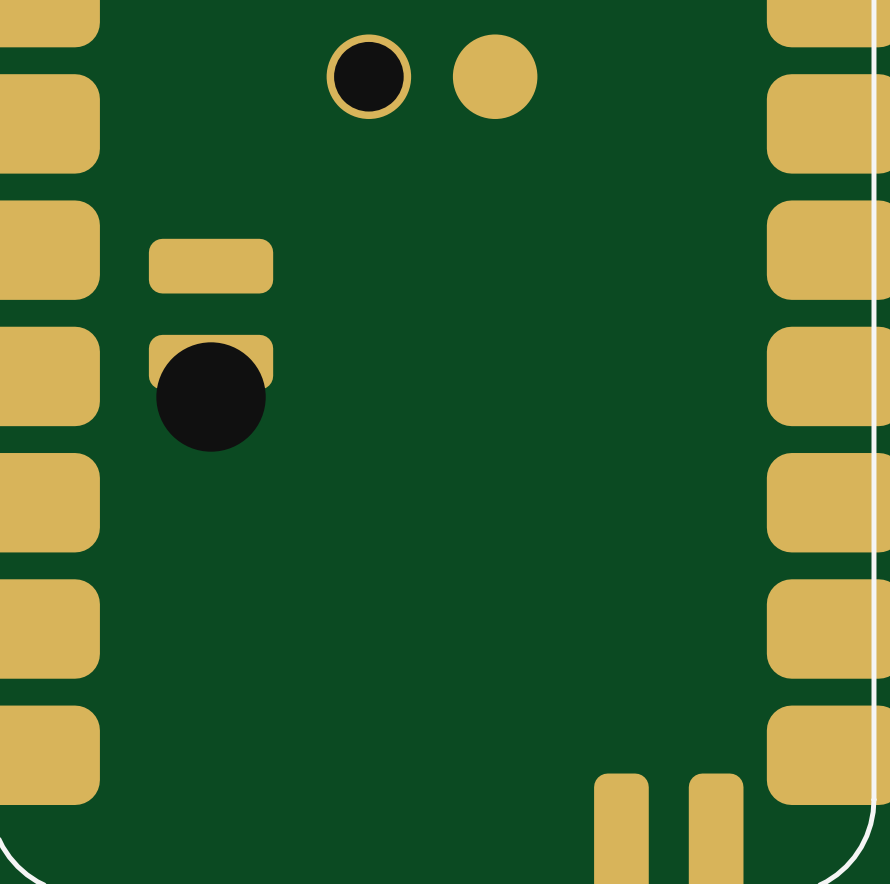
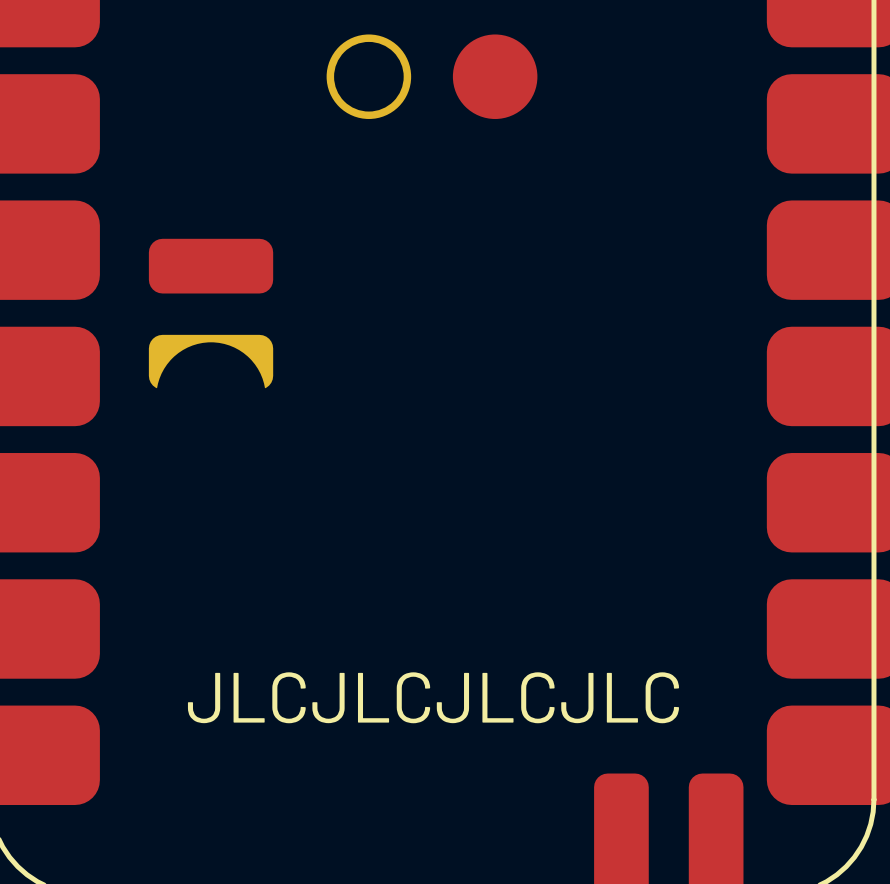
text: none -> JLCJLCJLCJLC (433, 697)

